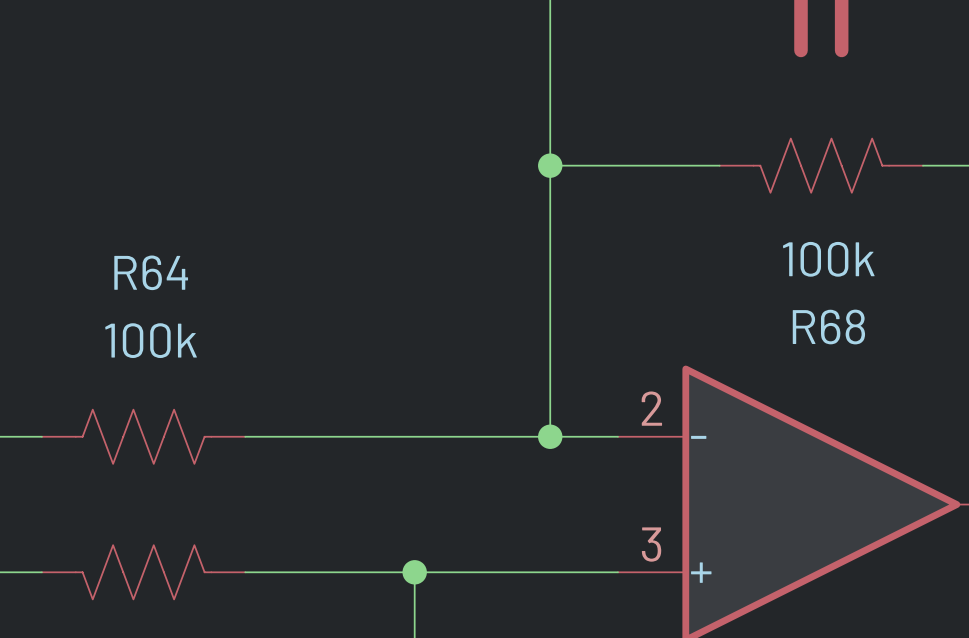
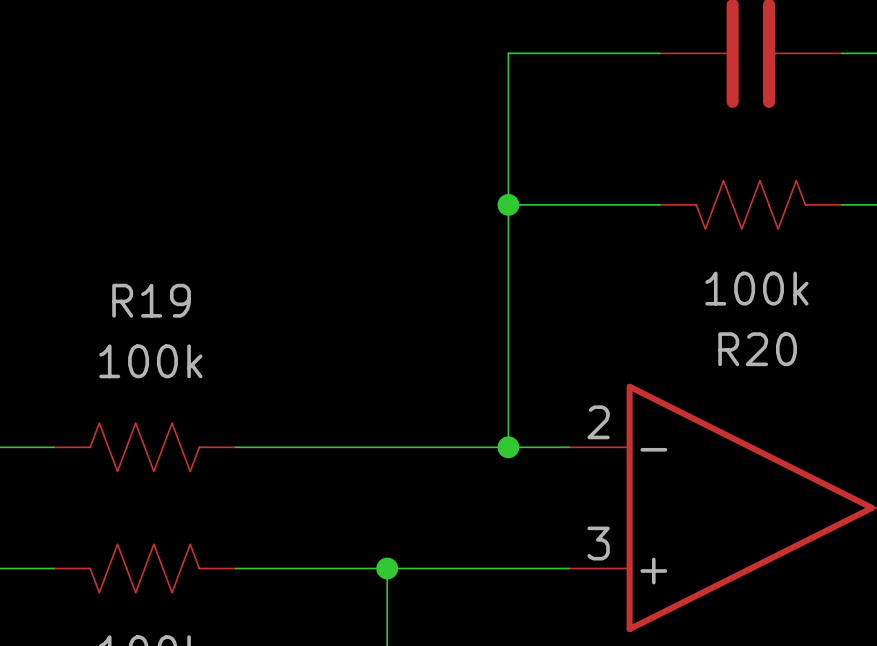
R64 name: R64 (151, 272) -> R19 (151, 300)
R68 name: R68 (828, 327) -> R20 (757, 349)

